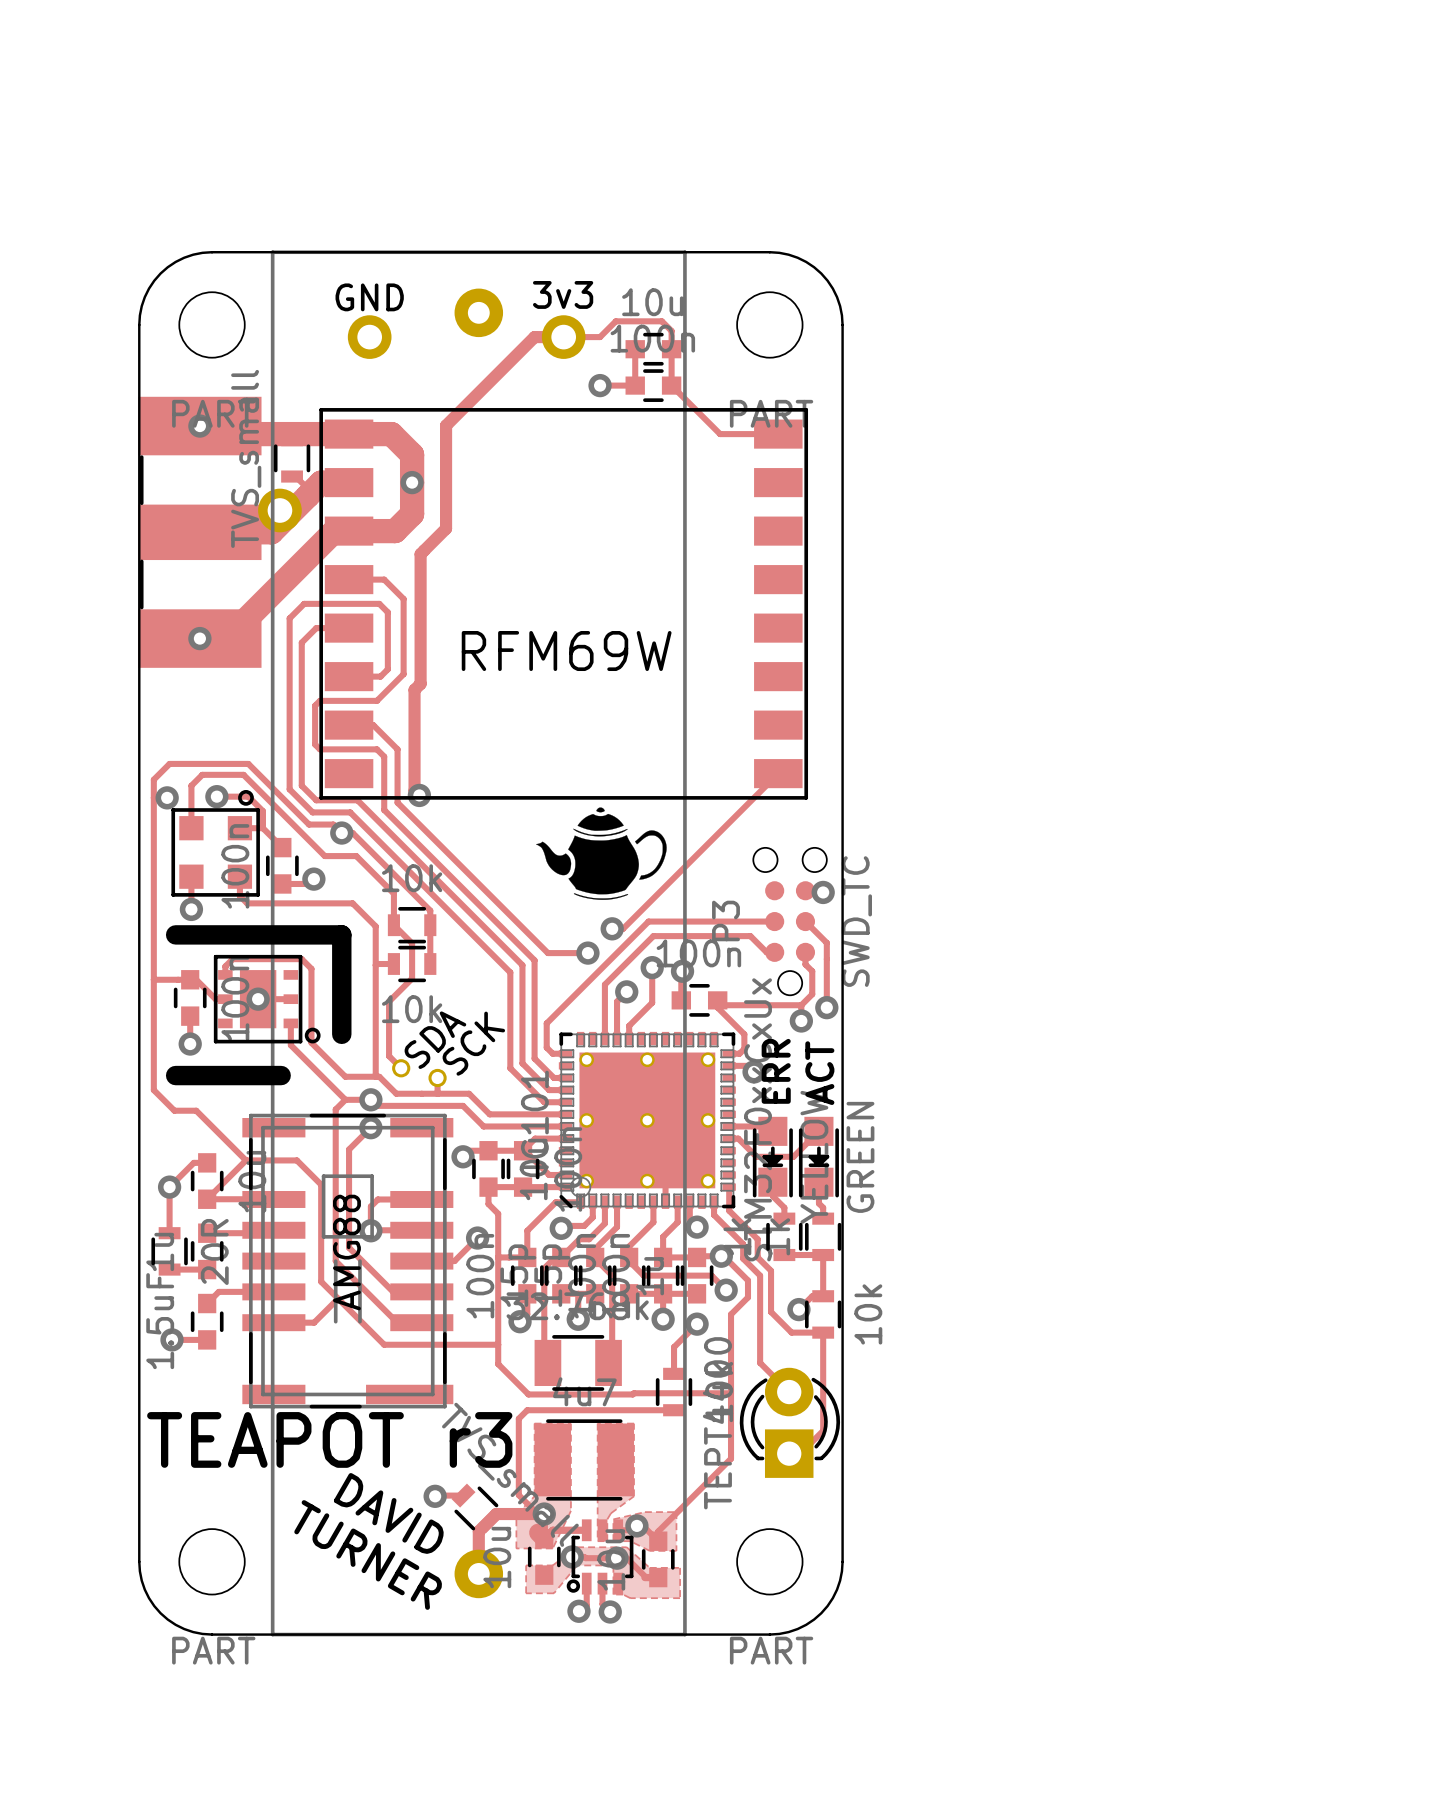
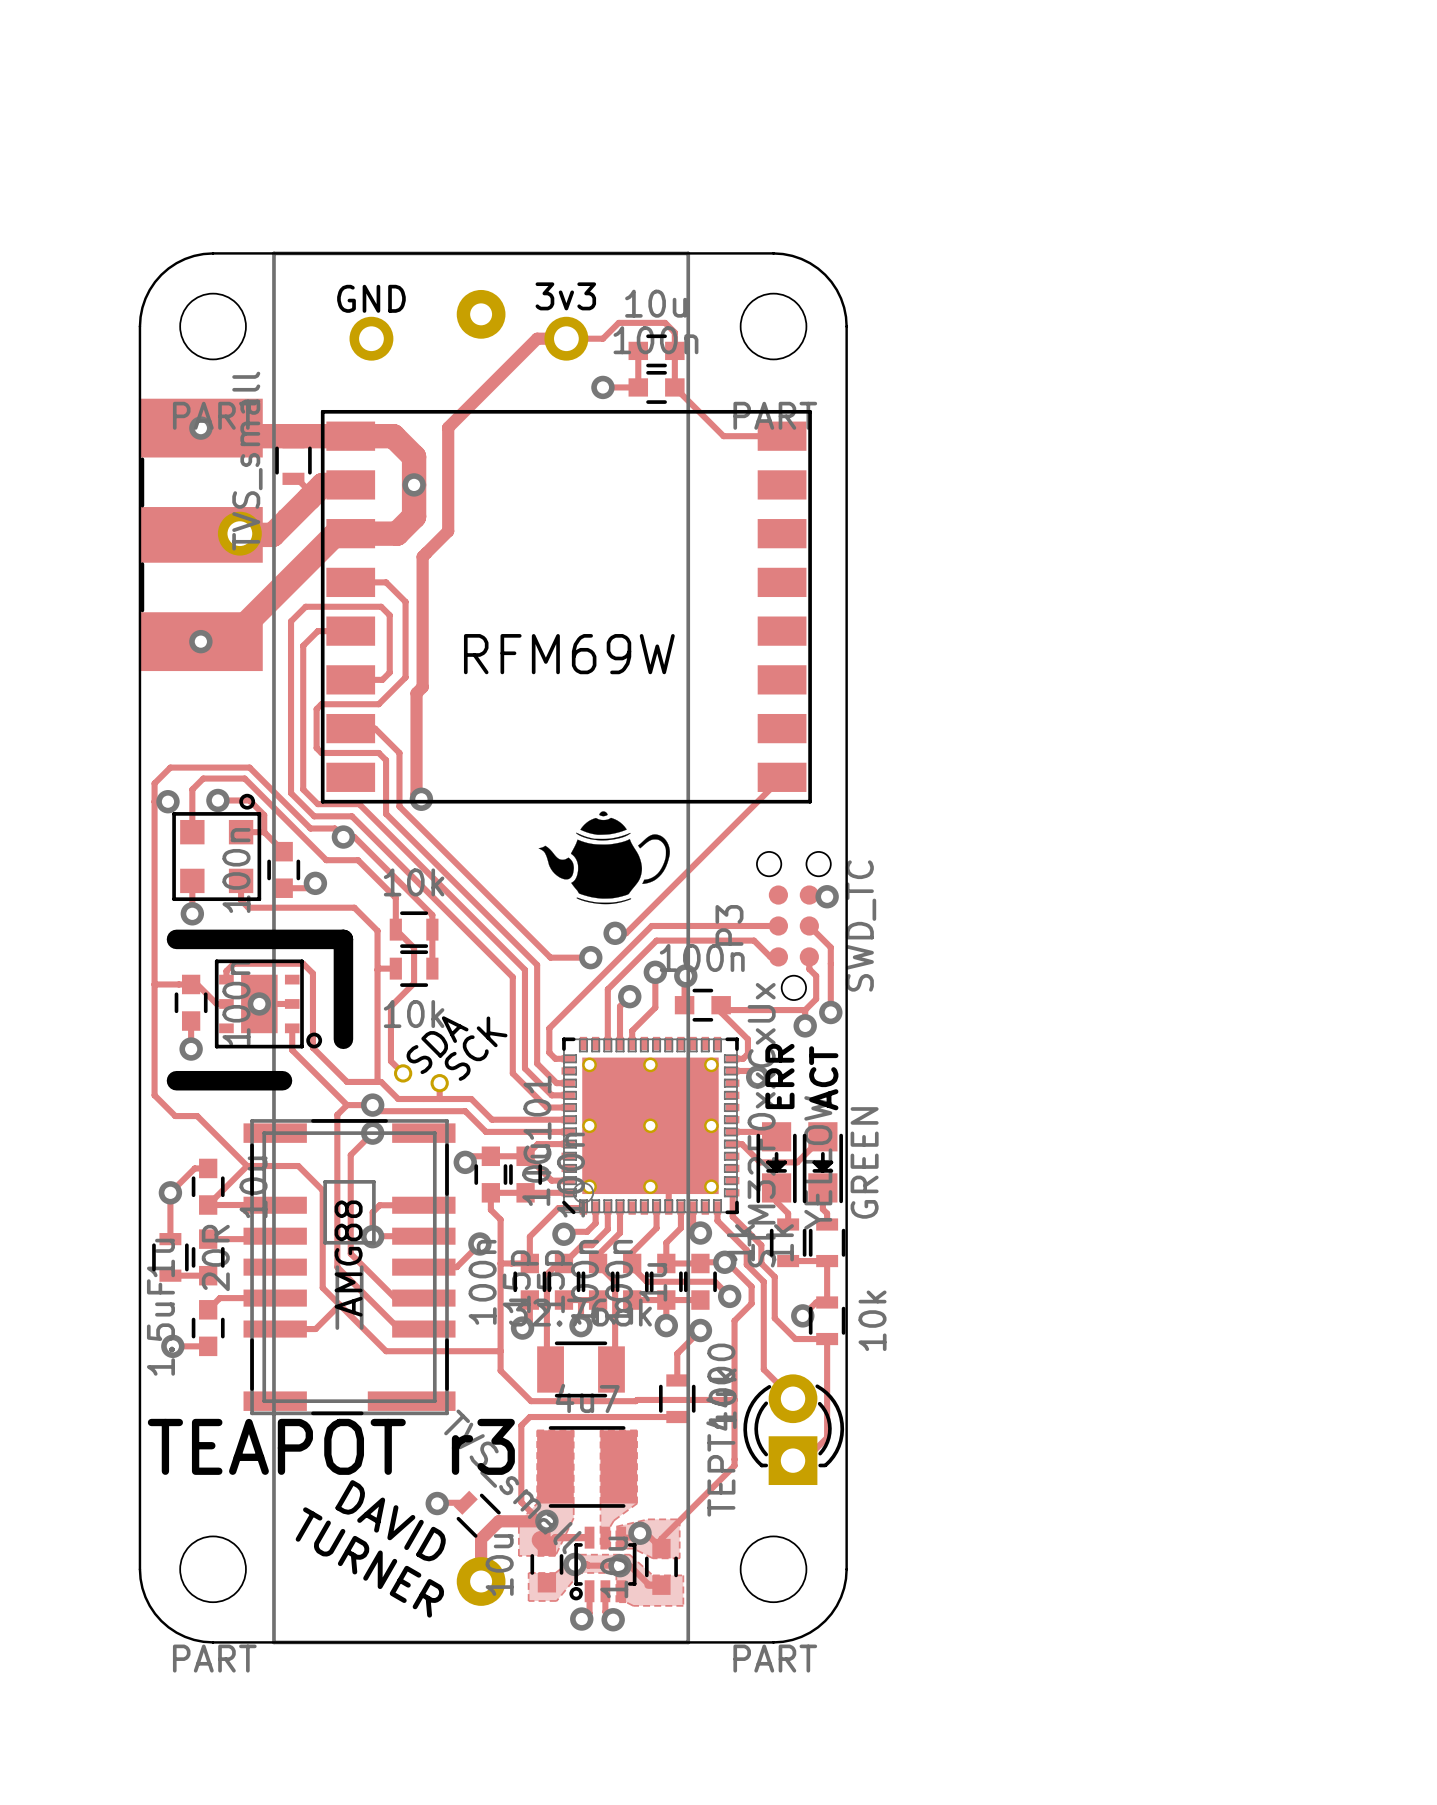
part position: (279, 510) -> (239, 533)

